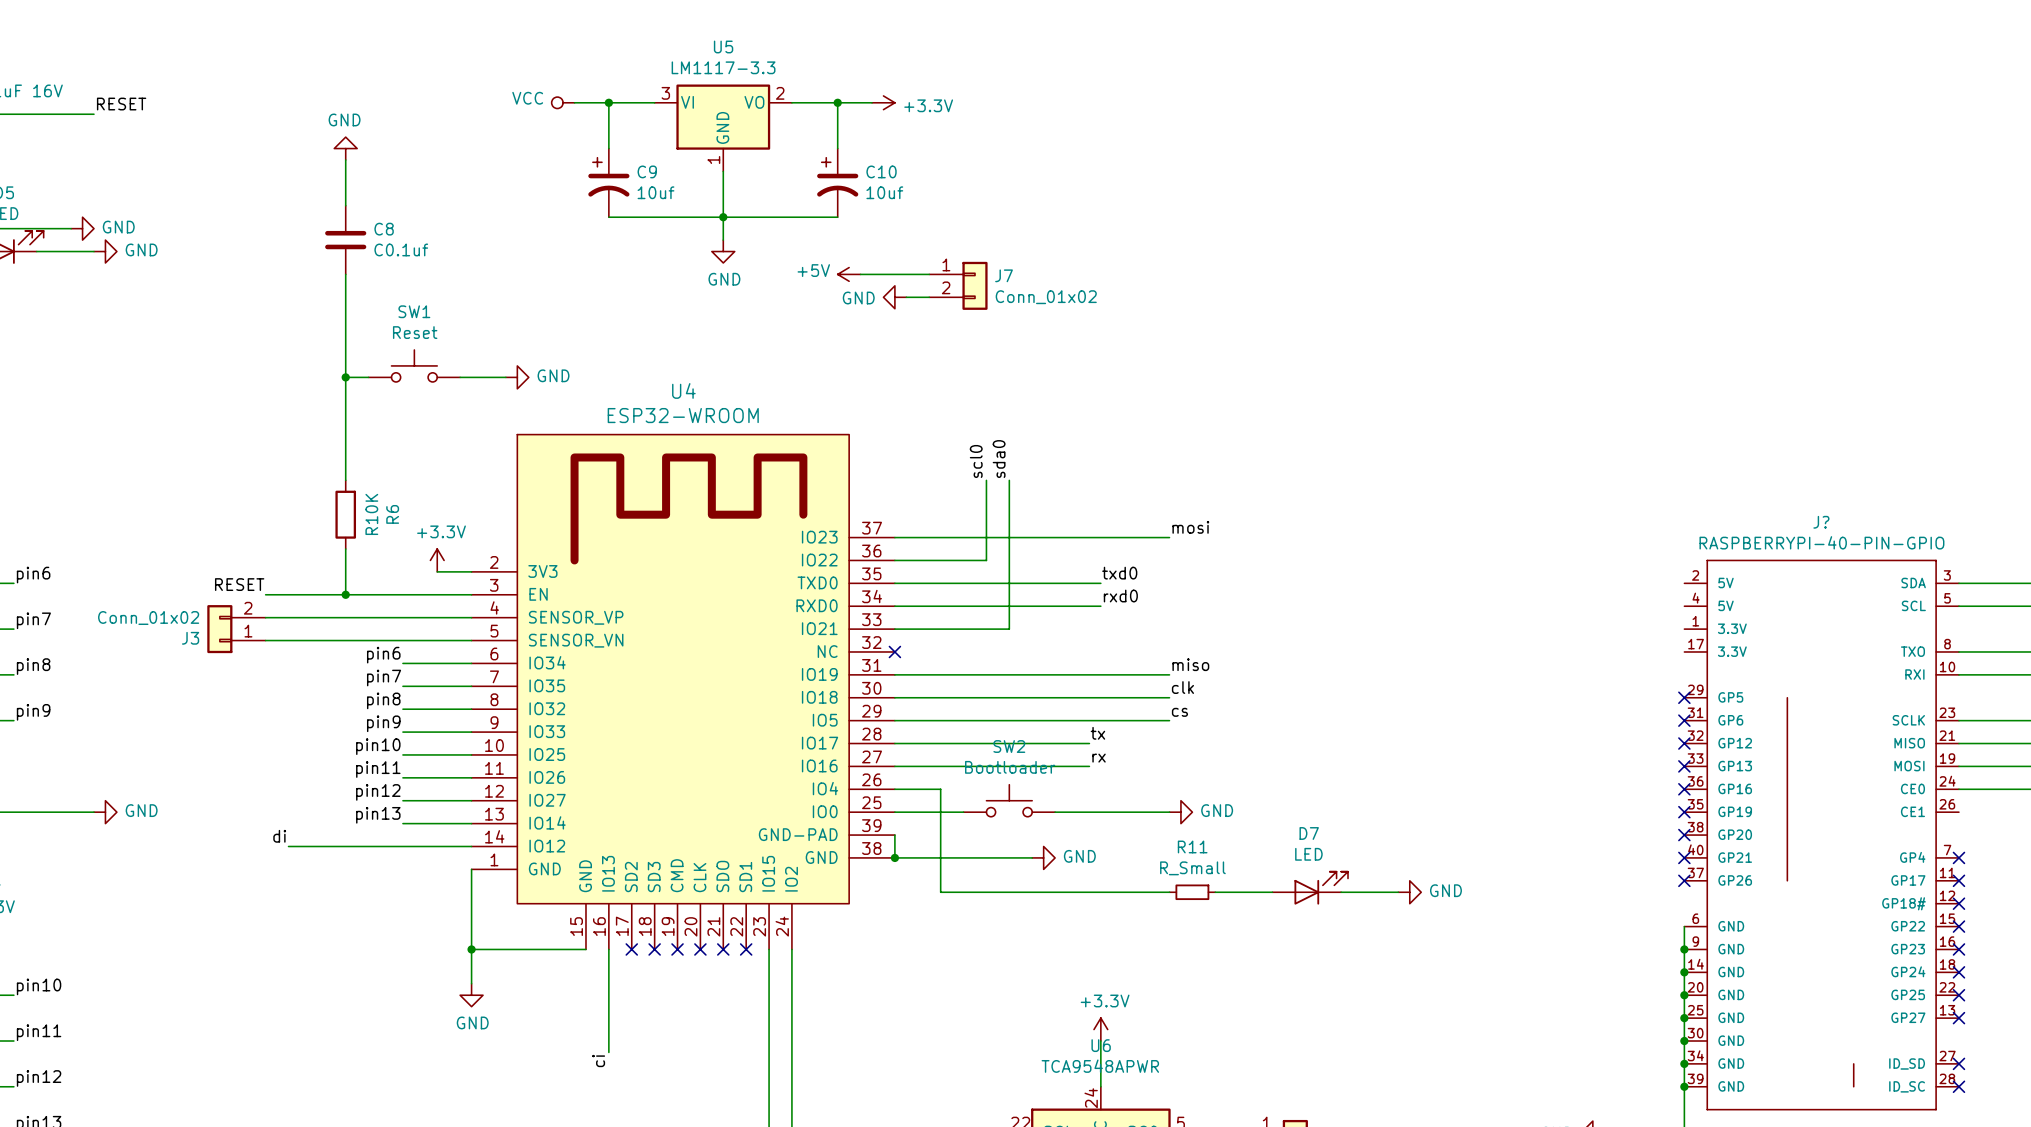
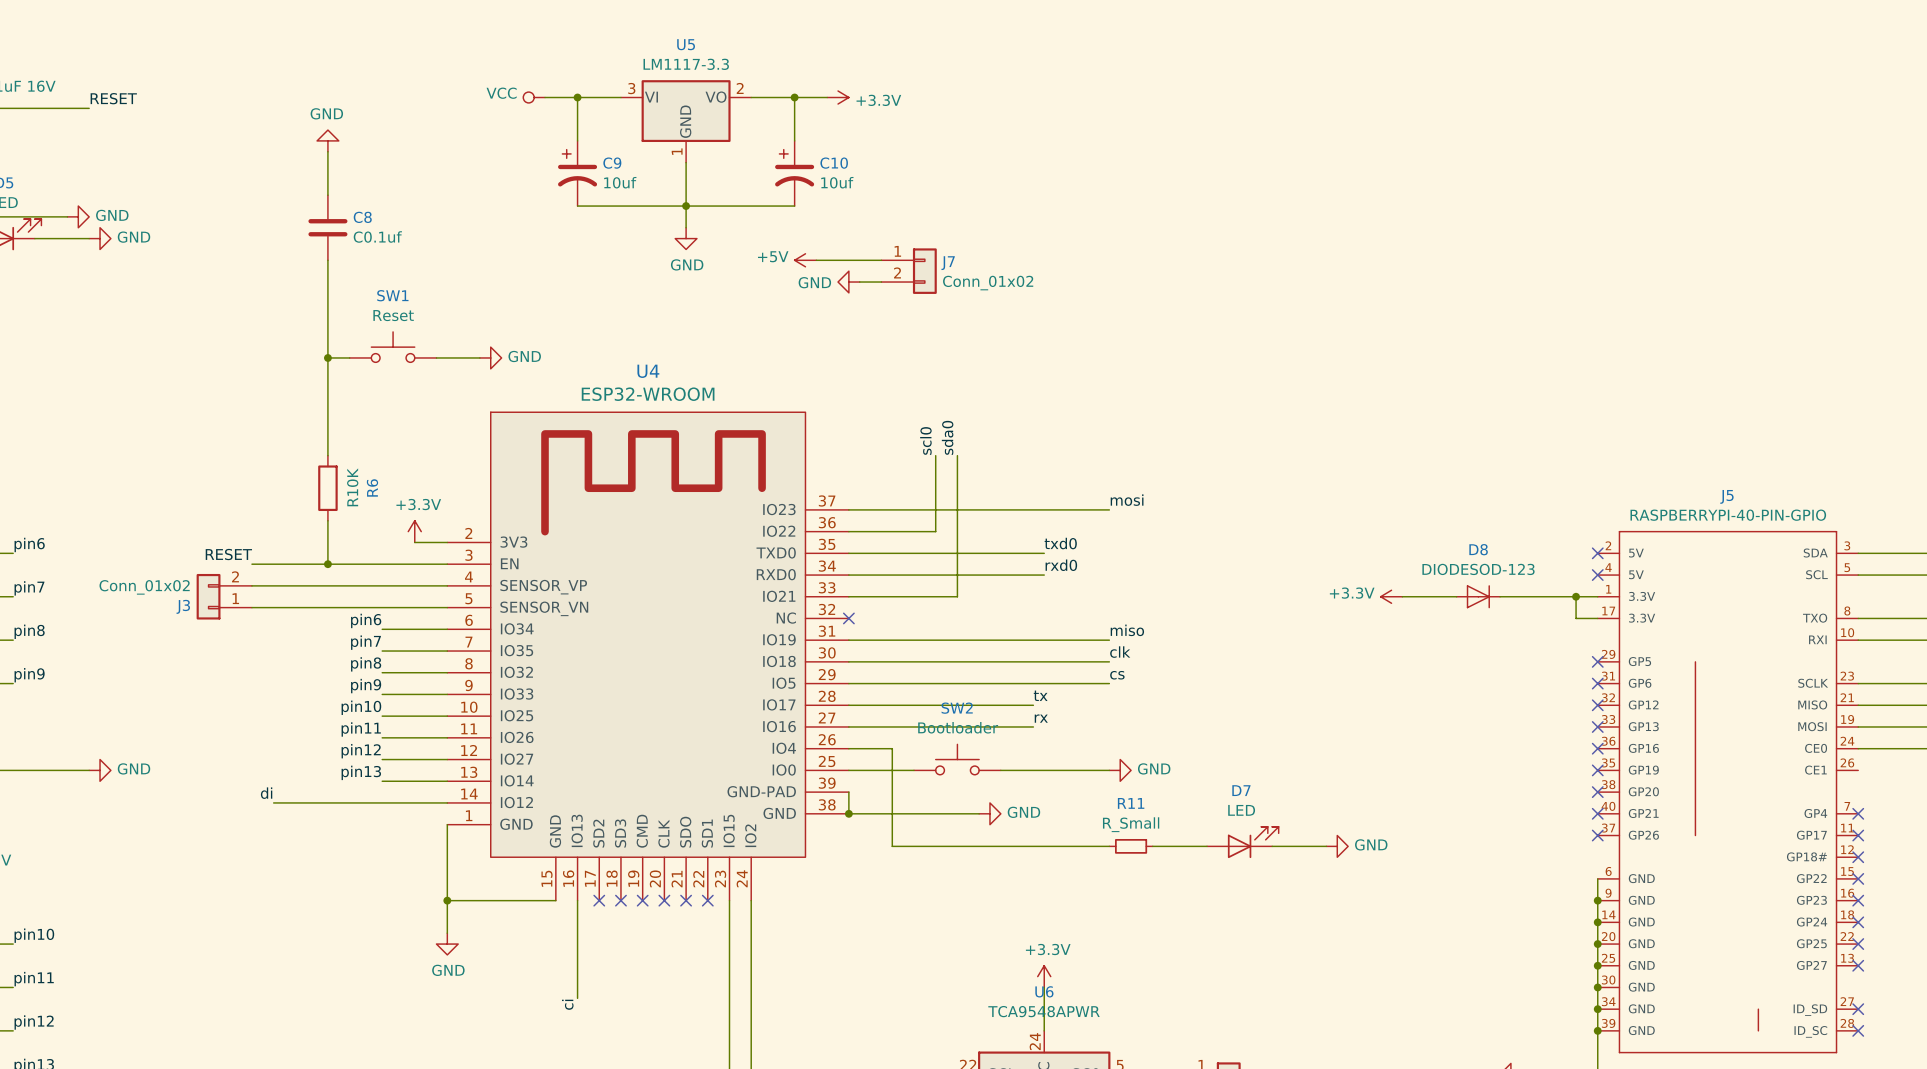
J? name: J? (1821, 522) -> J5 (1726, 496)
no-connect mark: none -> (1597, 553)
no-connect mark: none -> (1597, 575)
power symbol: none -> +3.3V (1391, 596)
wire: none -> (1402, 596) (1456, 596)
D8: none -> DIODESOD-123 (1478, 596)
wire: none -> (1500, 596) (1597, 596)
wire: none -> (1576, 596) (1576, 618) (1597, 618)
junction: none -> (1576, 596)

